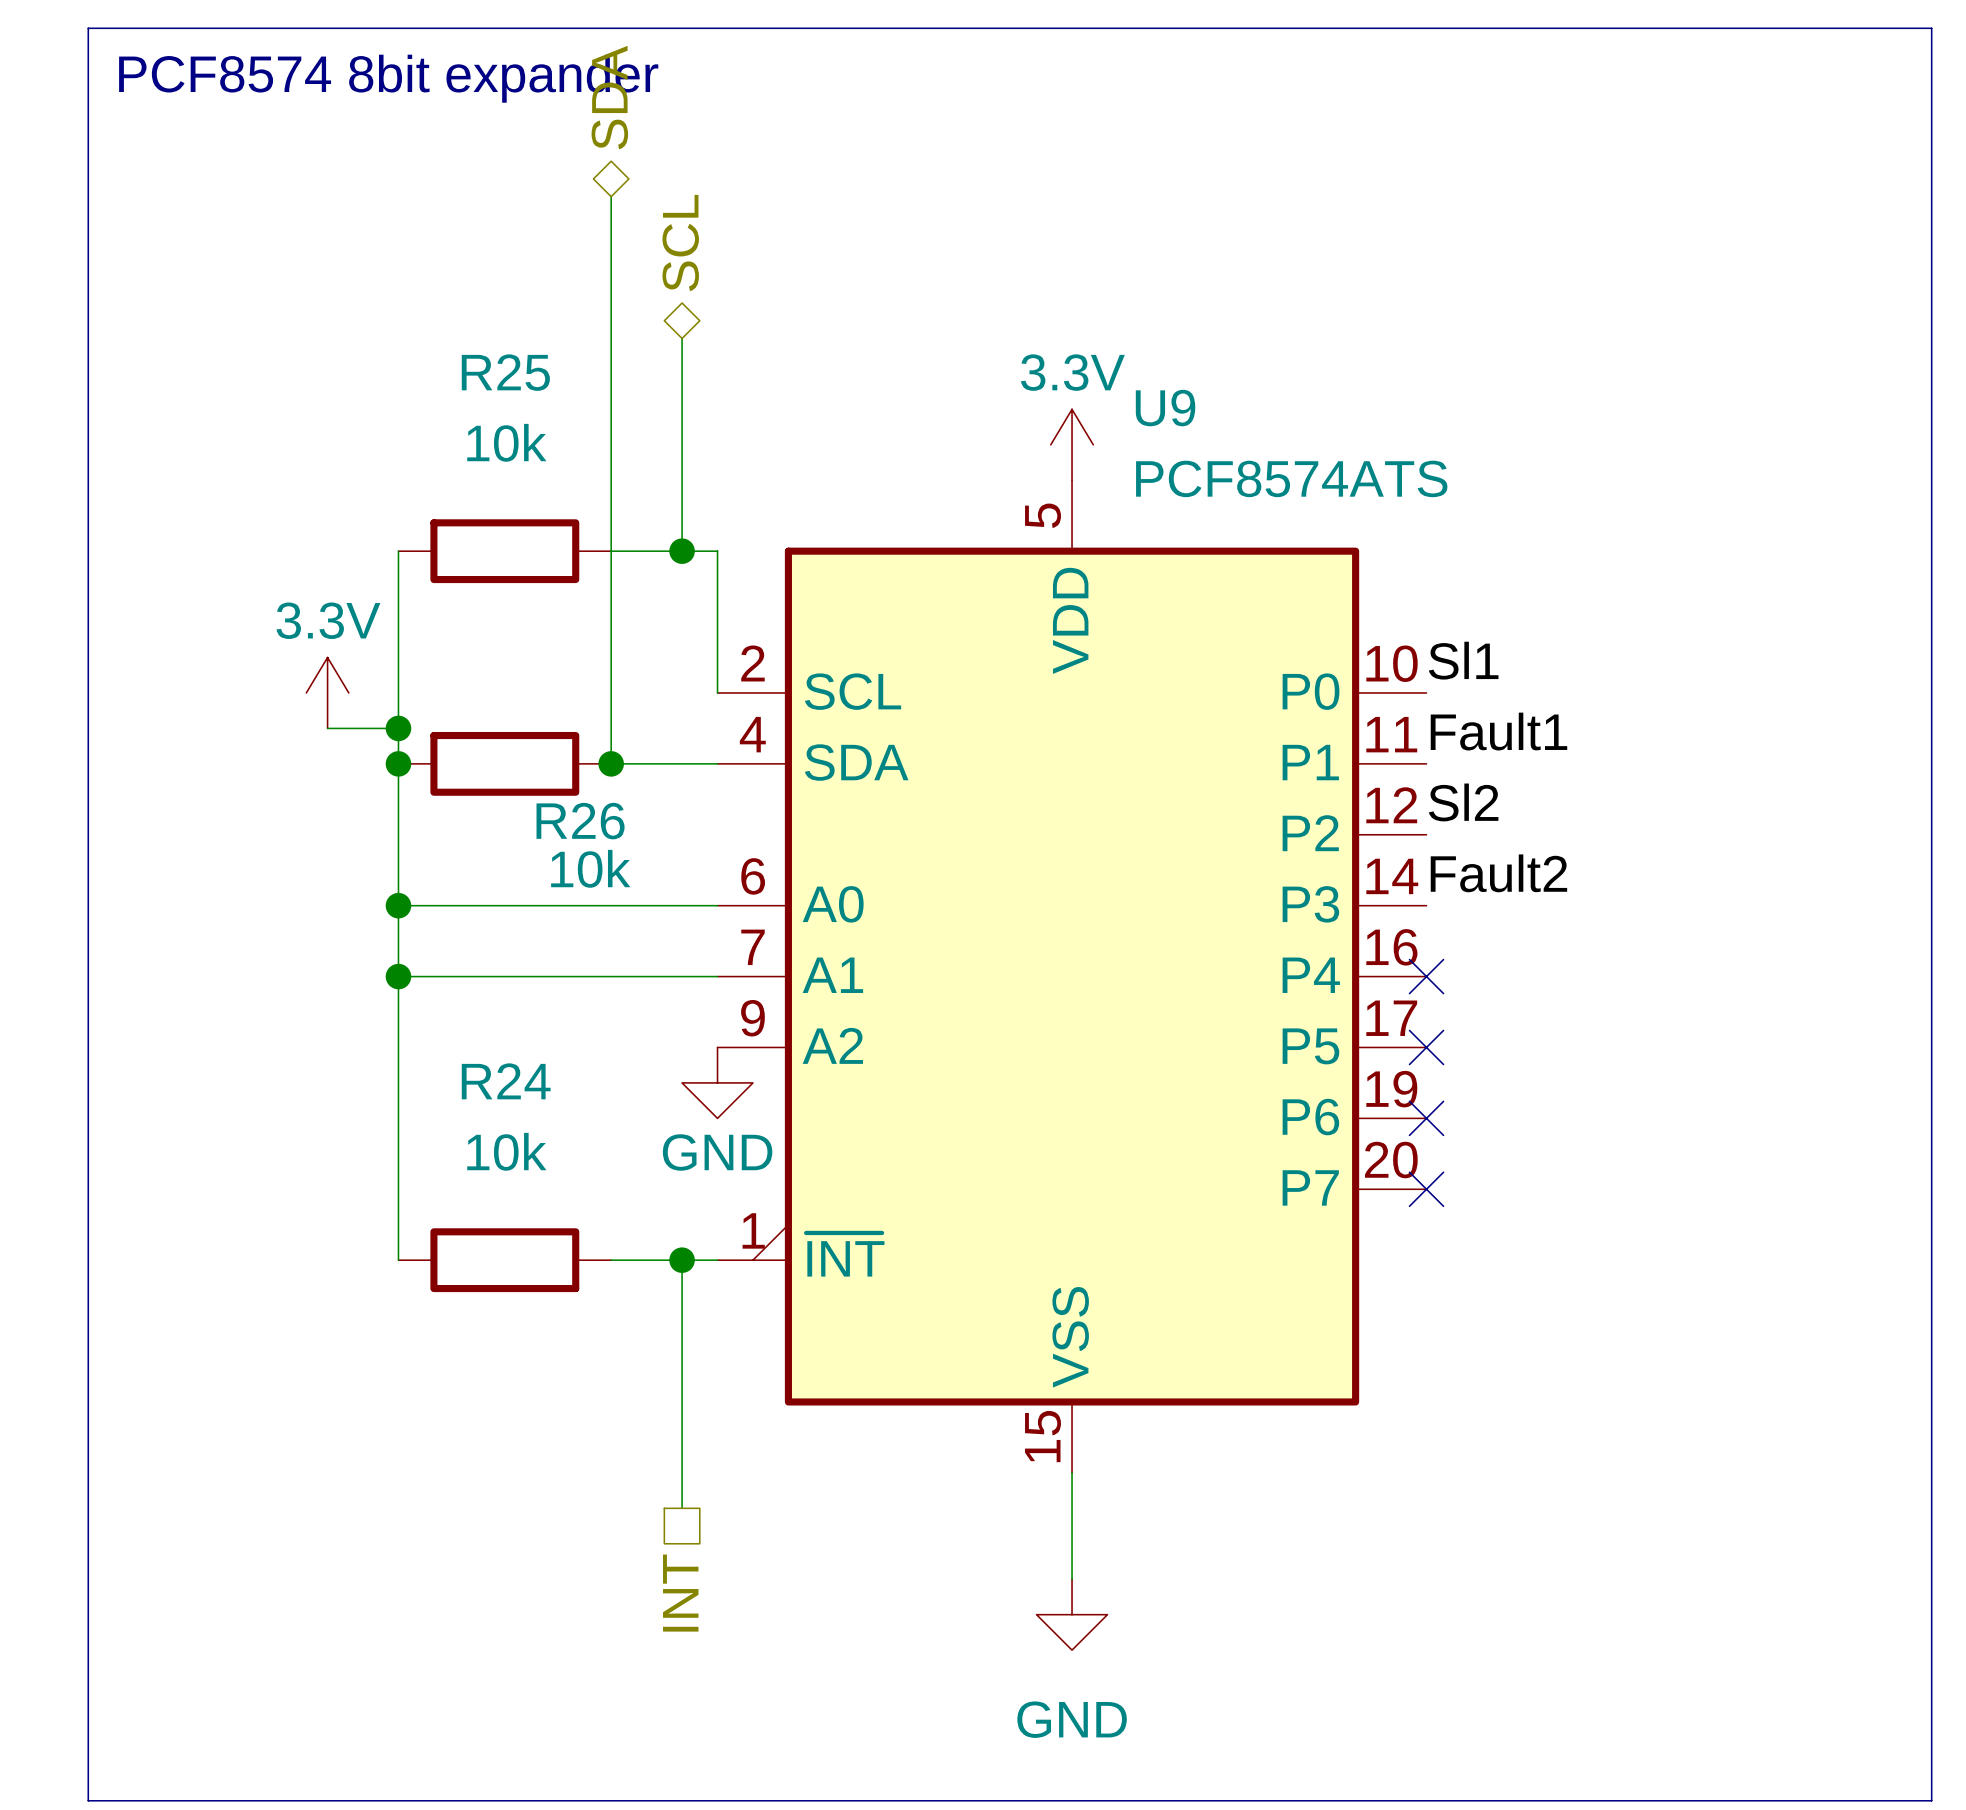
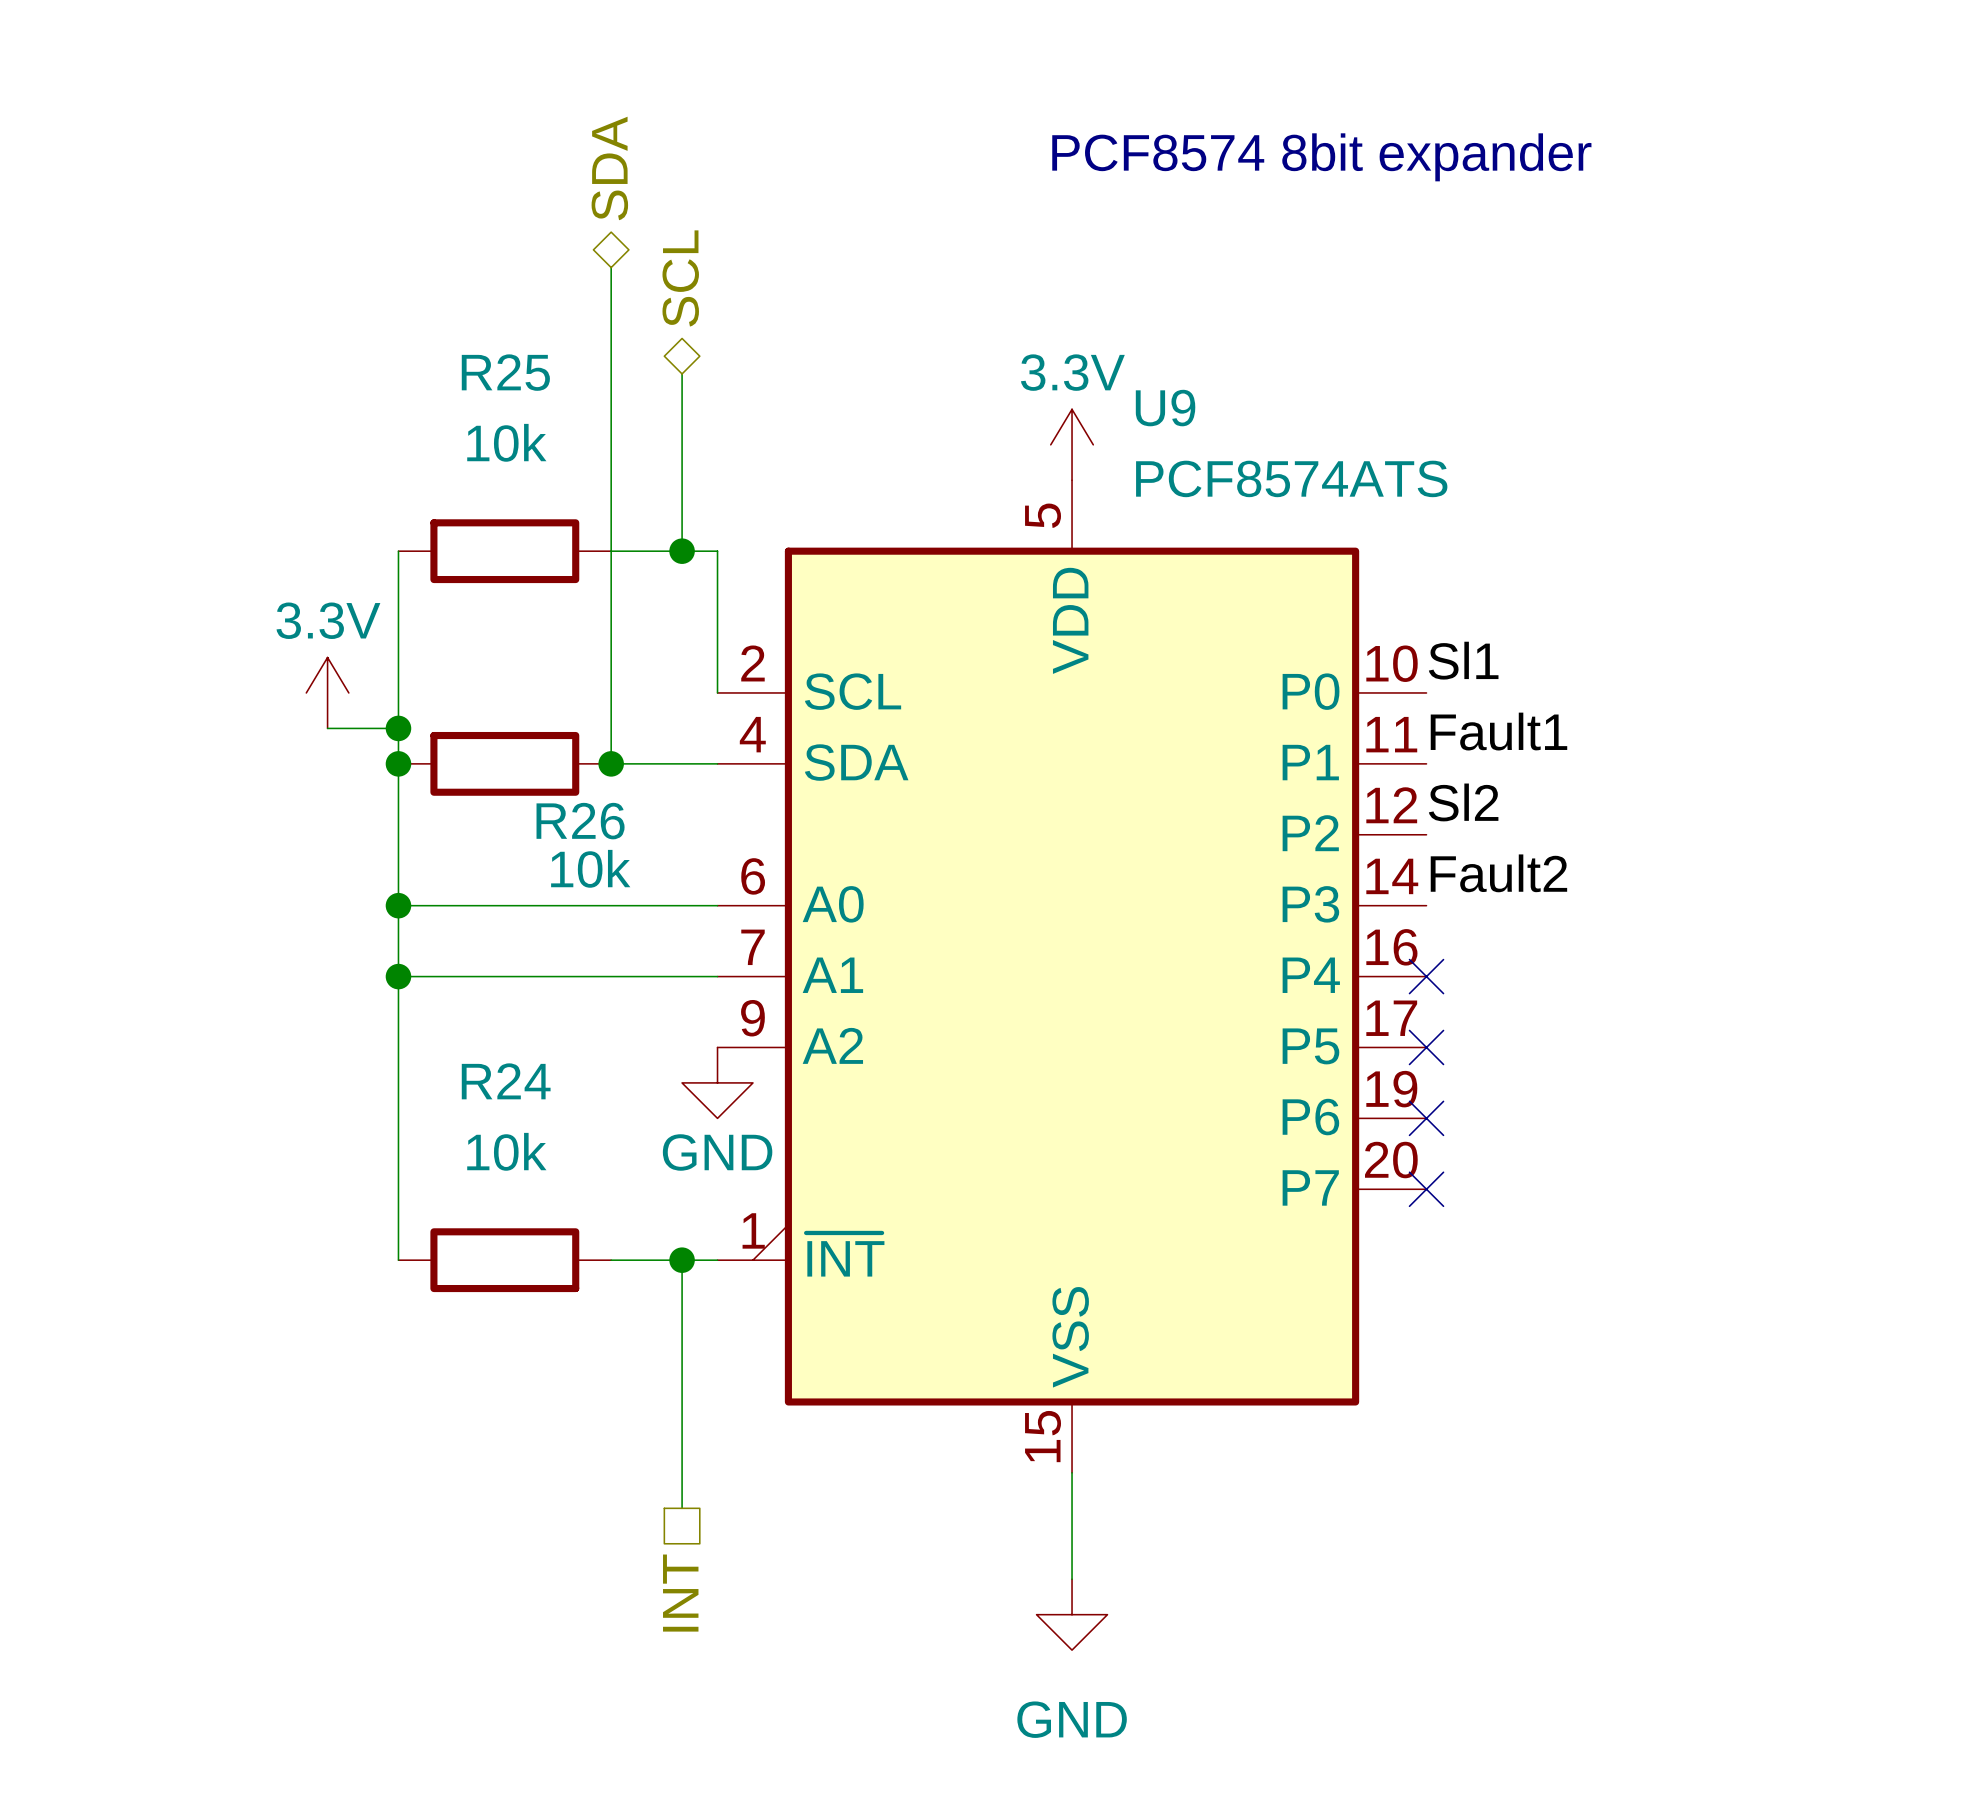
line: (88, 28) (1931, 28) (1931, 1800) (88, 1800) (88, 28) -> none
text: PCF8574 8bit expander (388, 78) -> none
hierarchical label position: SDA (609, 97) -> SDA (609, 168)
text: none -> PCF8574 8bit expander (1321, 157)
wire: (611, 196) (611, 267) -> none
hierarchical label position: SCL (680, 243) -> SCL (680, 278)
wire: (682, 338) (682, 373) -> none

